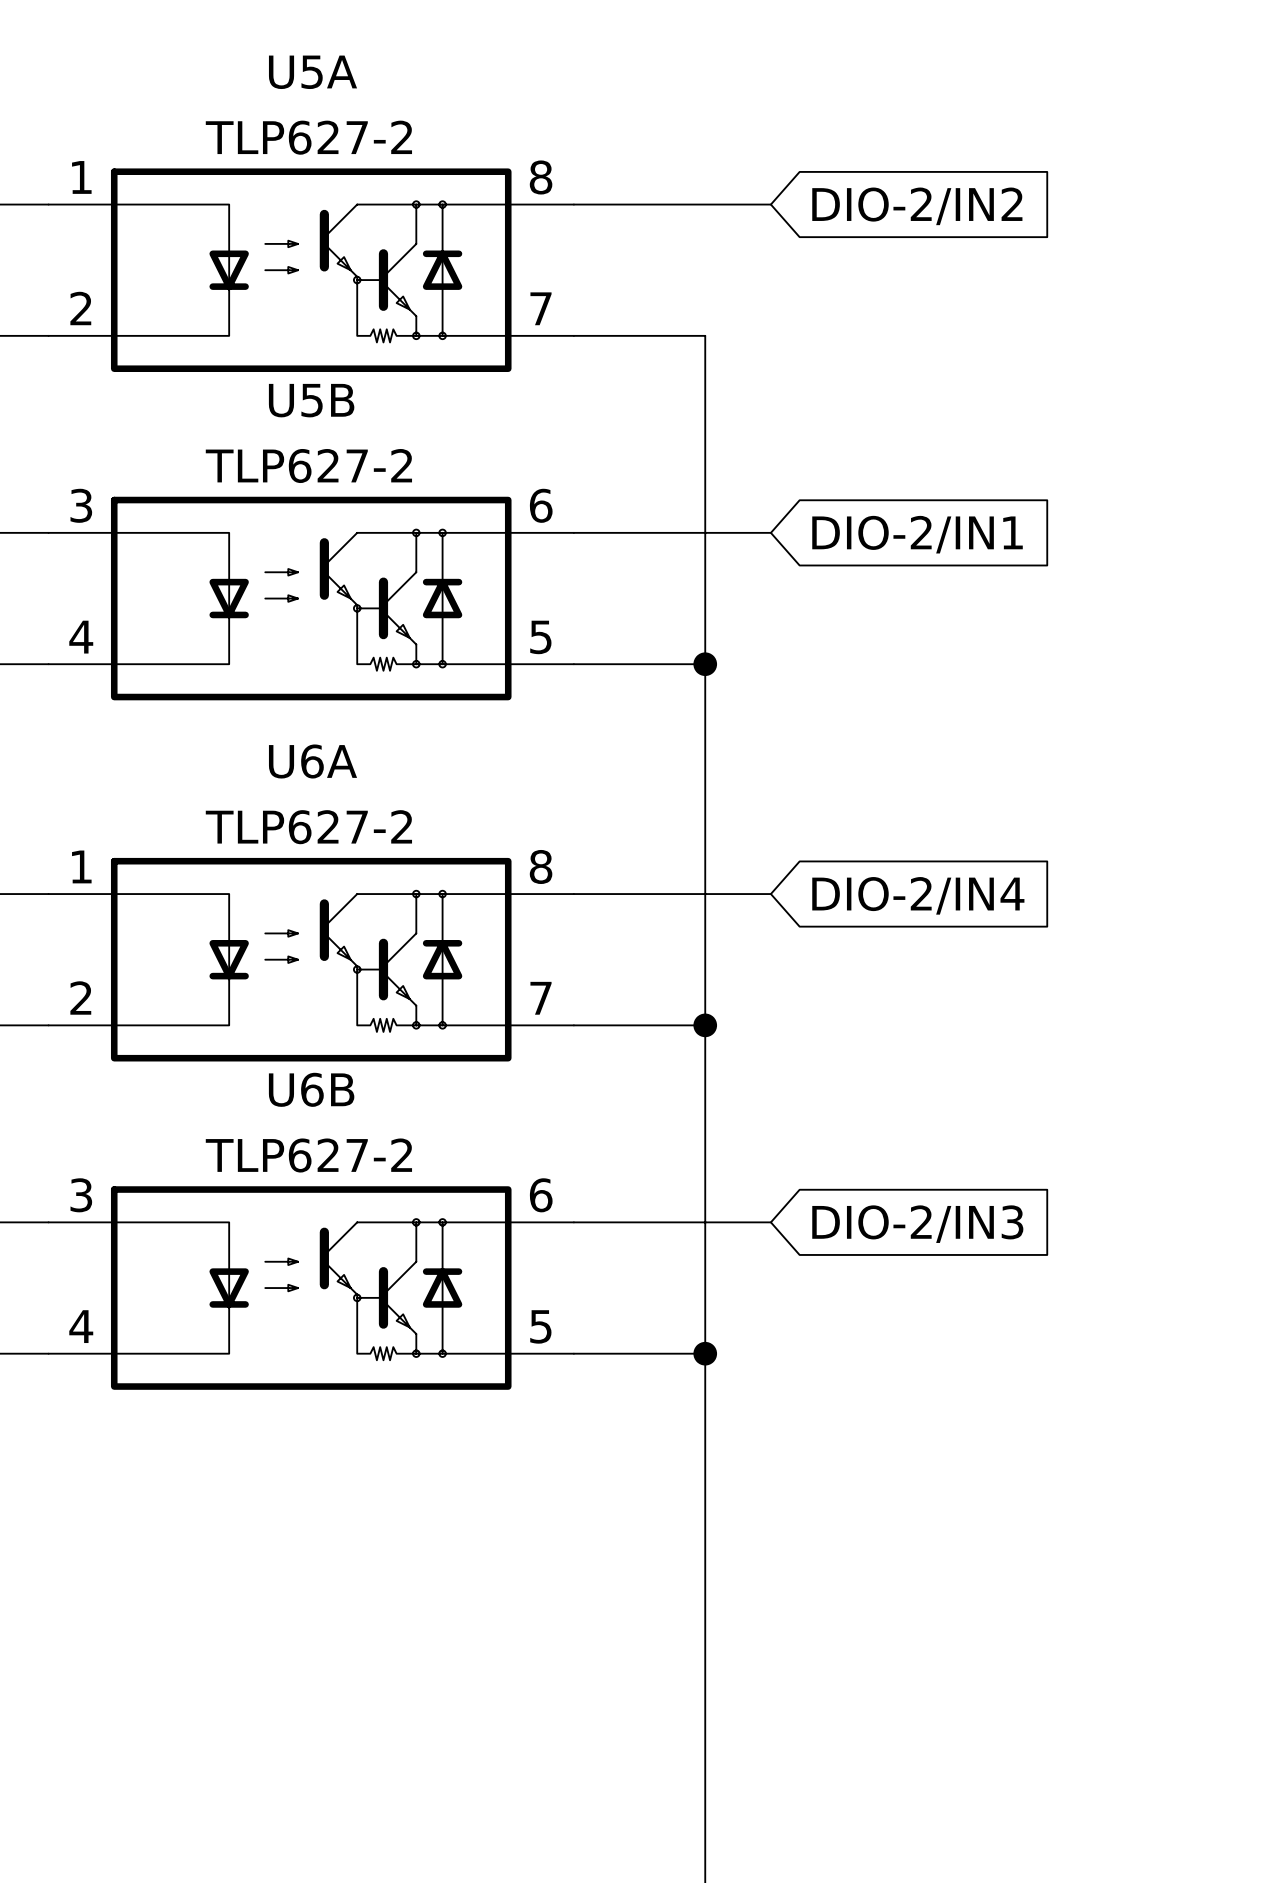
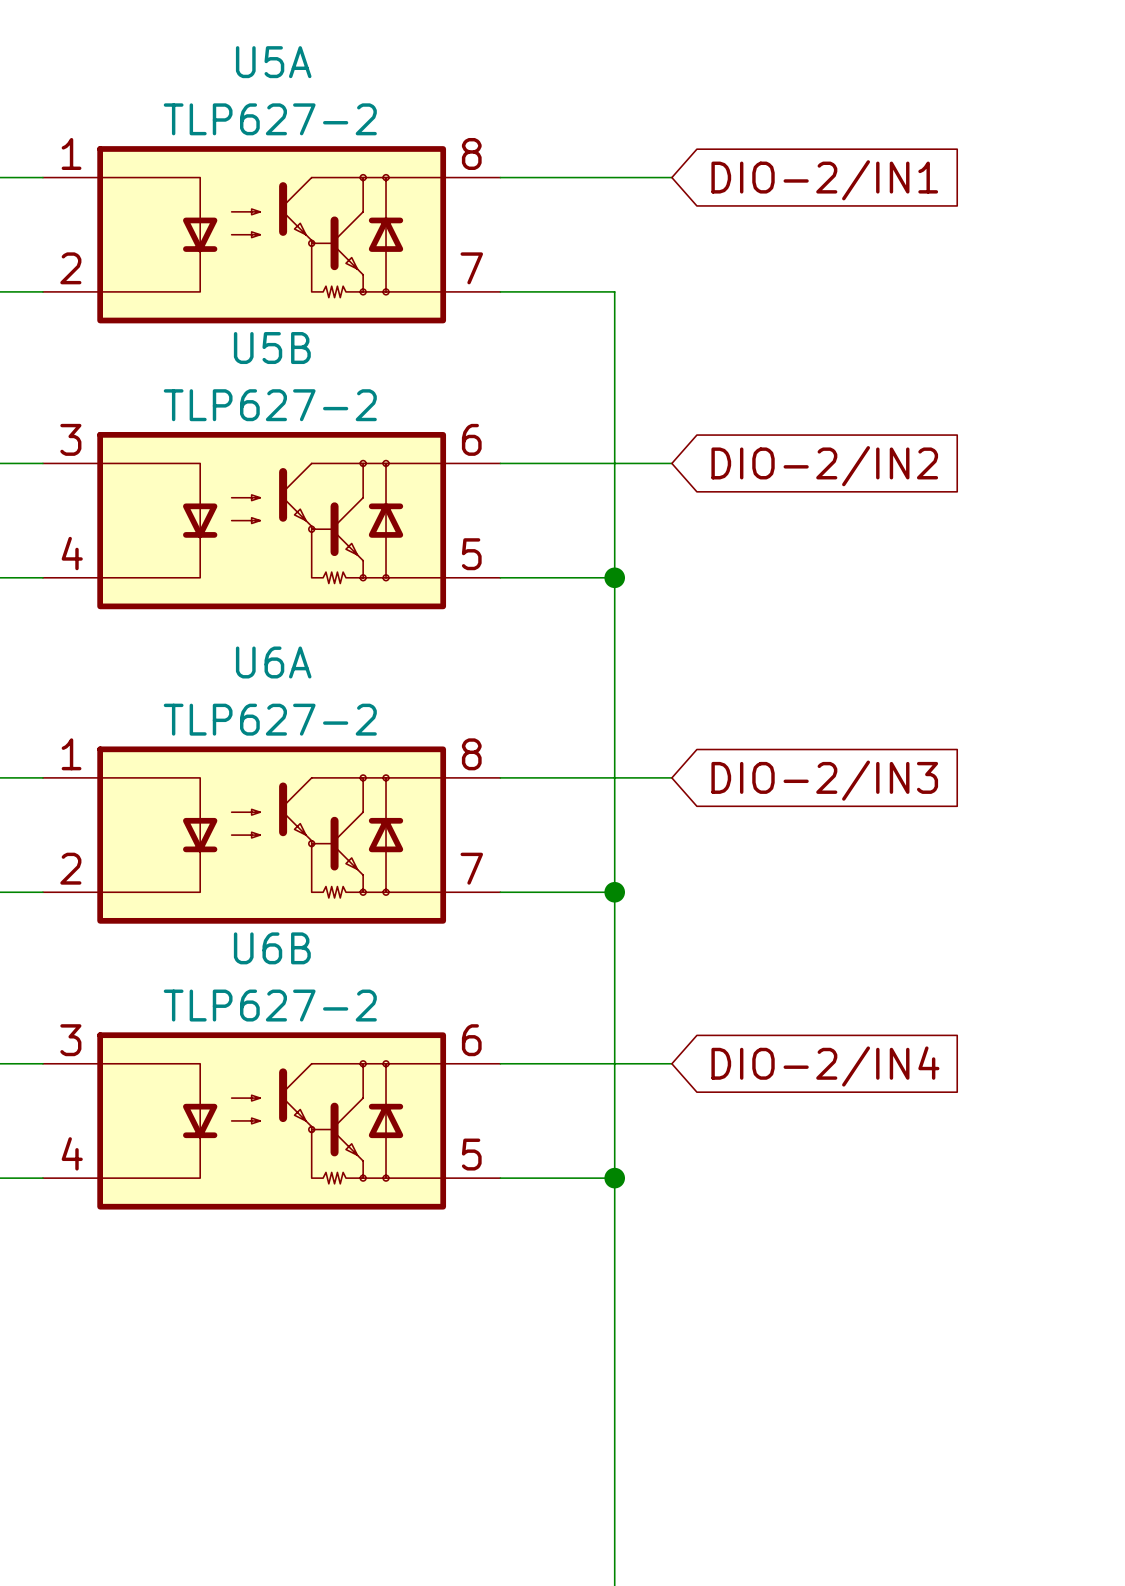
global label: DIO-2/IN2 (917, 206) -> DIO-2/IN1 (824, 180)
global label: DIO-2/IN1 (917, 534) -> DIO-2/IN2 (824, 466)
global label: DIO-2/IN4 (918, 895) -> DIO-2/IN3 (824, 780)
global label: DIO-2/IN3 (917, 1224) -> DIO-2/IN4 (825, 1066)

